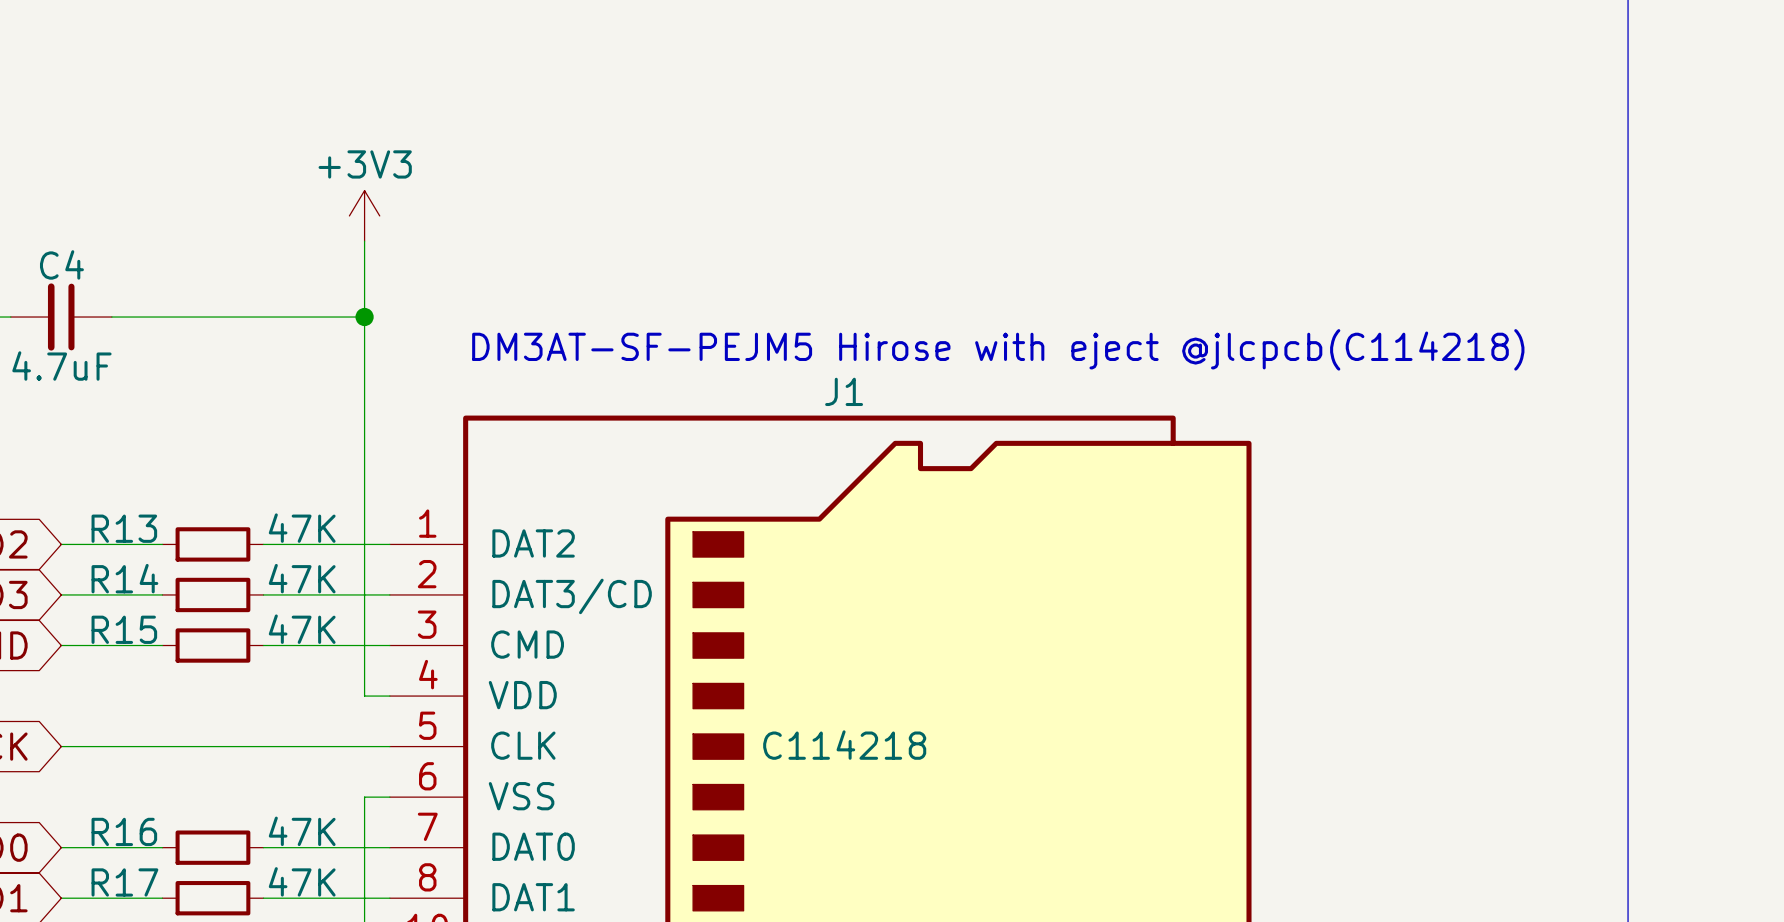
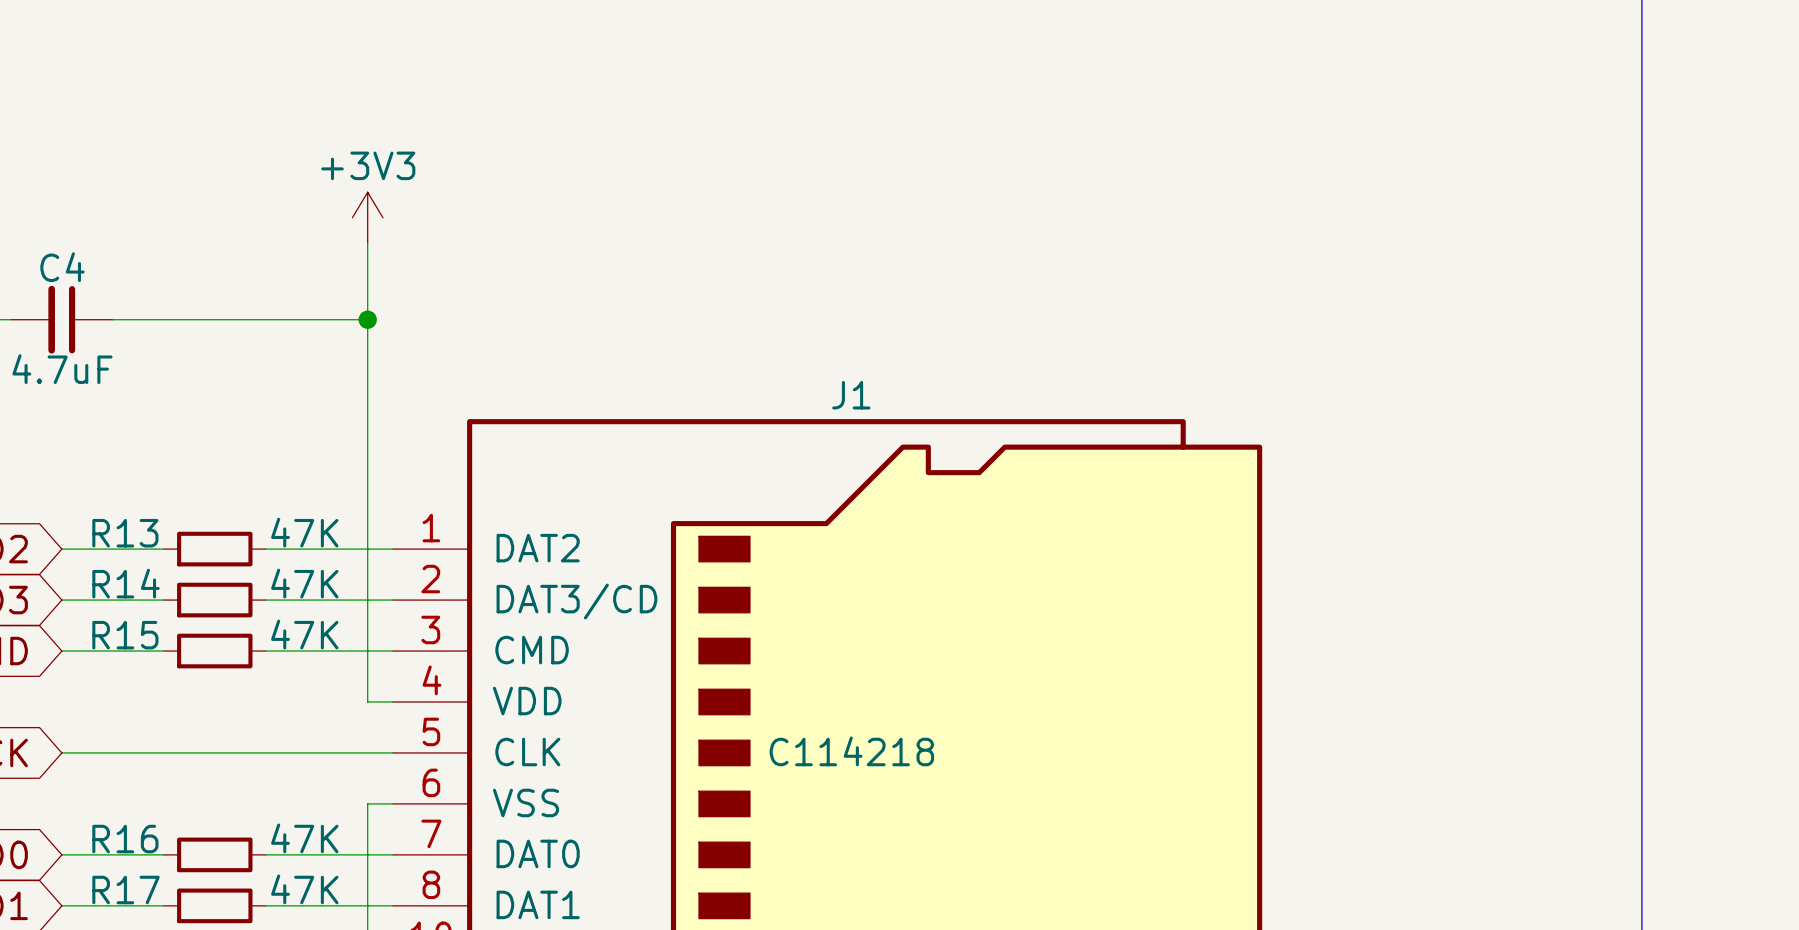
text: DM3AT-SF-PEJM5 Hirose with eject @jlcpcb(C114218) (998, 349) -> none

